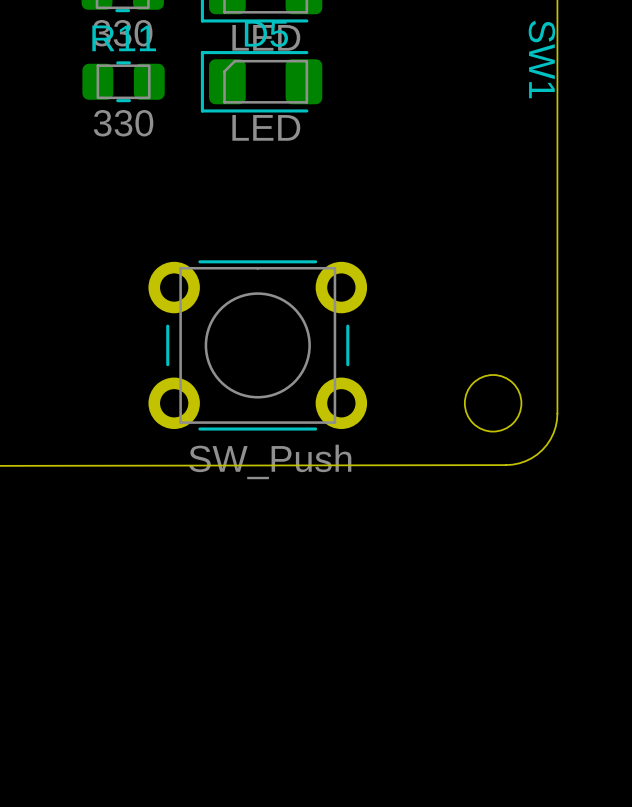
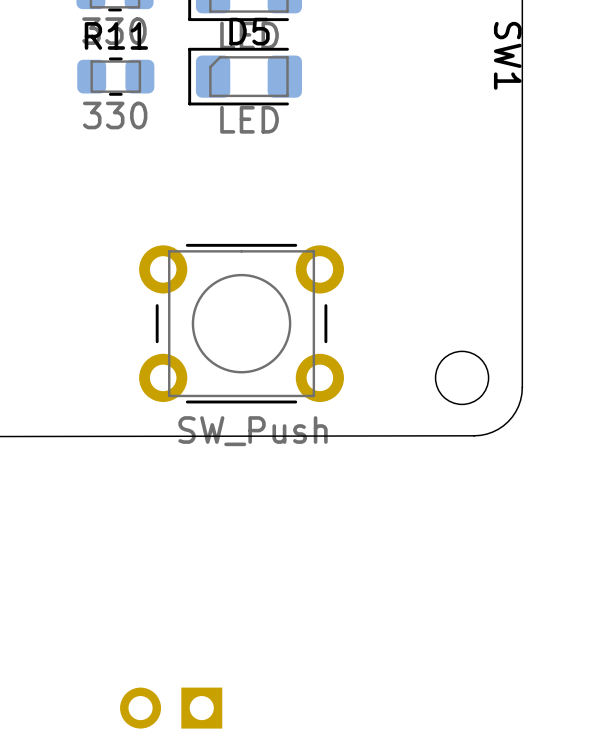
part: none -> (171, 708)

